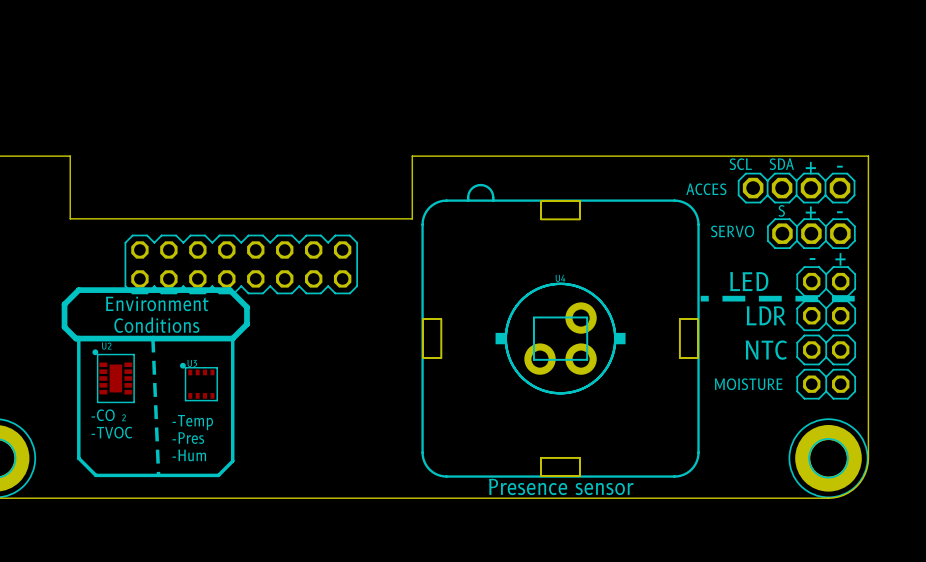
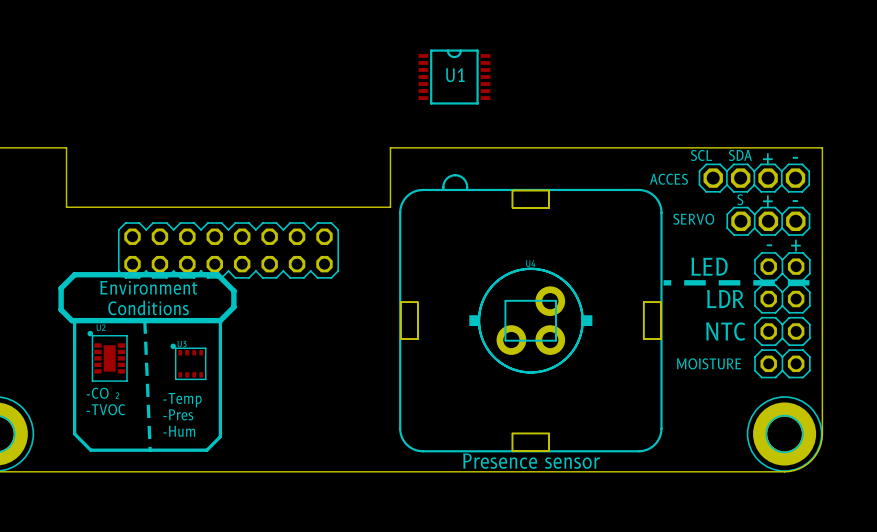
U1: none -> (454, 77)

